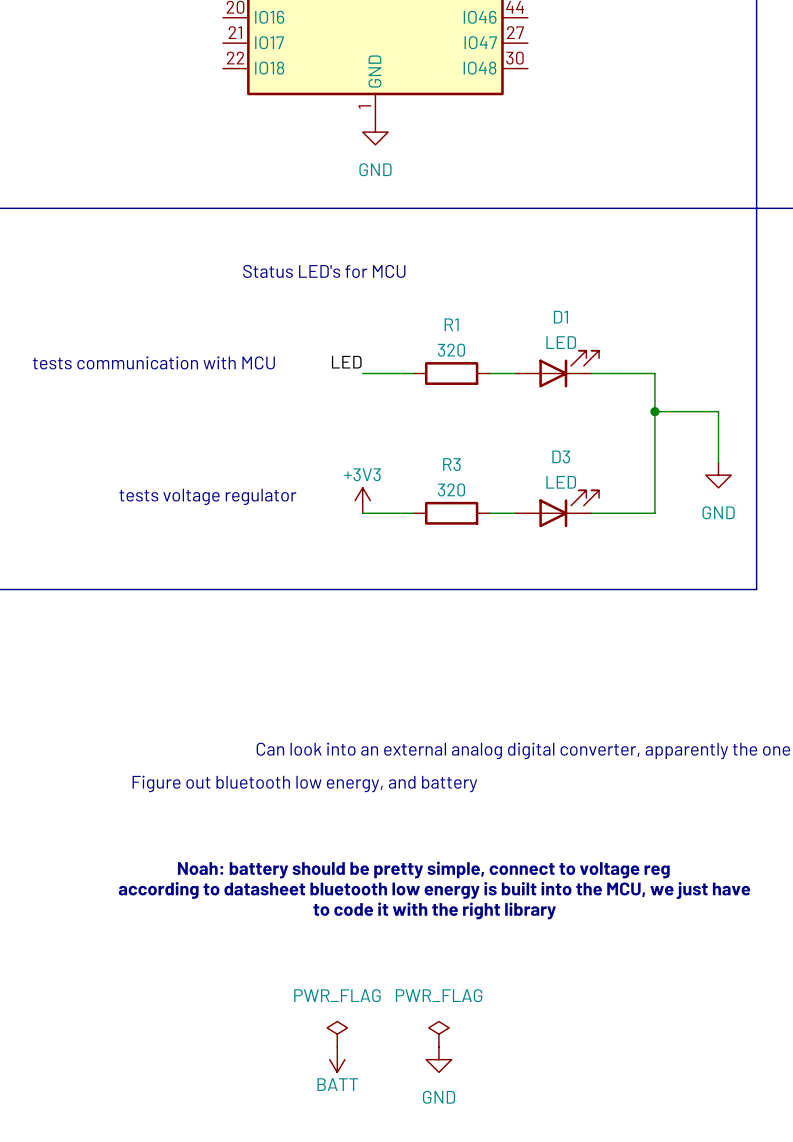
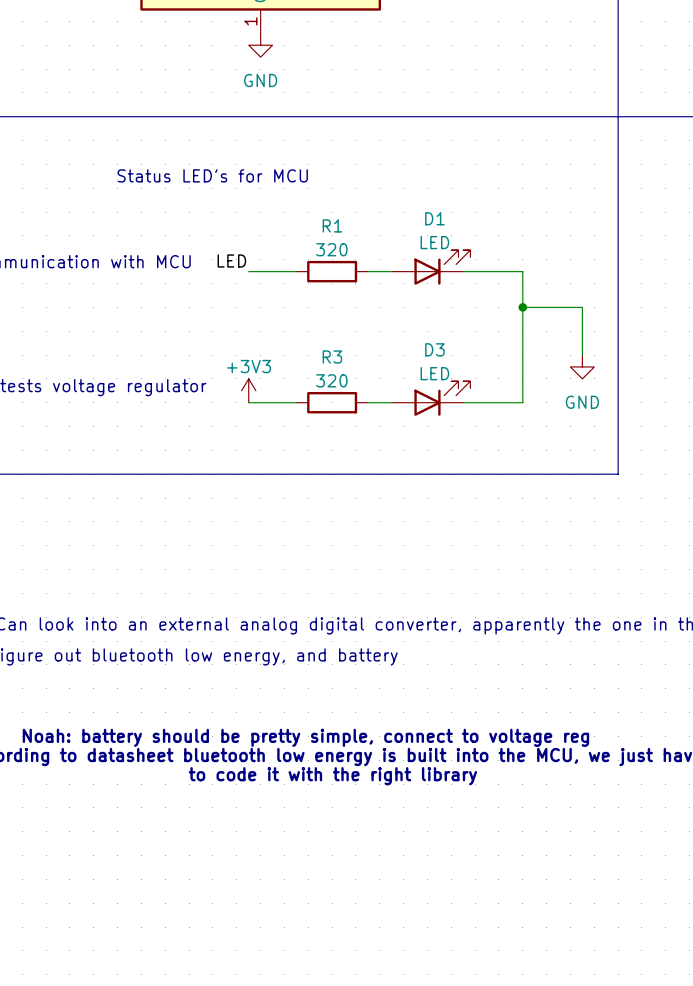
power symbol: PWR_FLAG (337, 1034) -> none
power symbol: PWR_FLAG (438, 1034) -> none
power symbol: BATT (337, 1059) -> none
power symbol: GND (438, 1059) -> none

